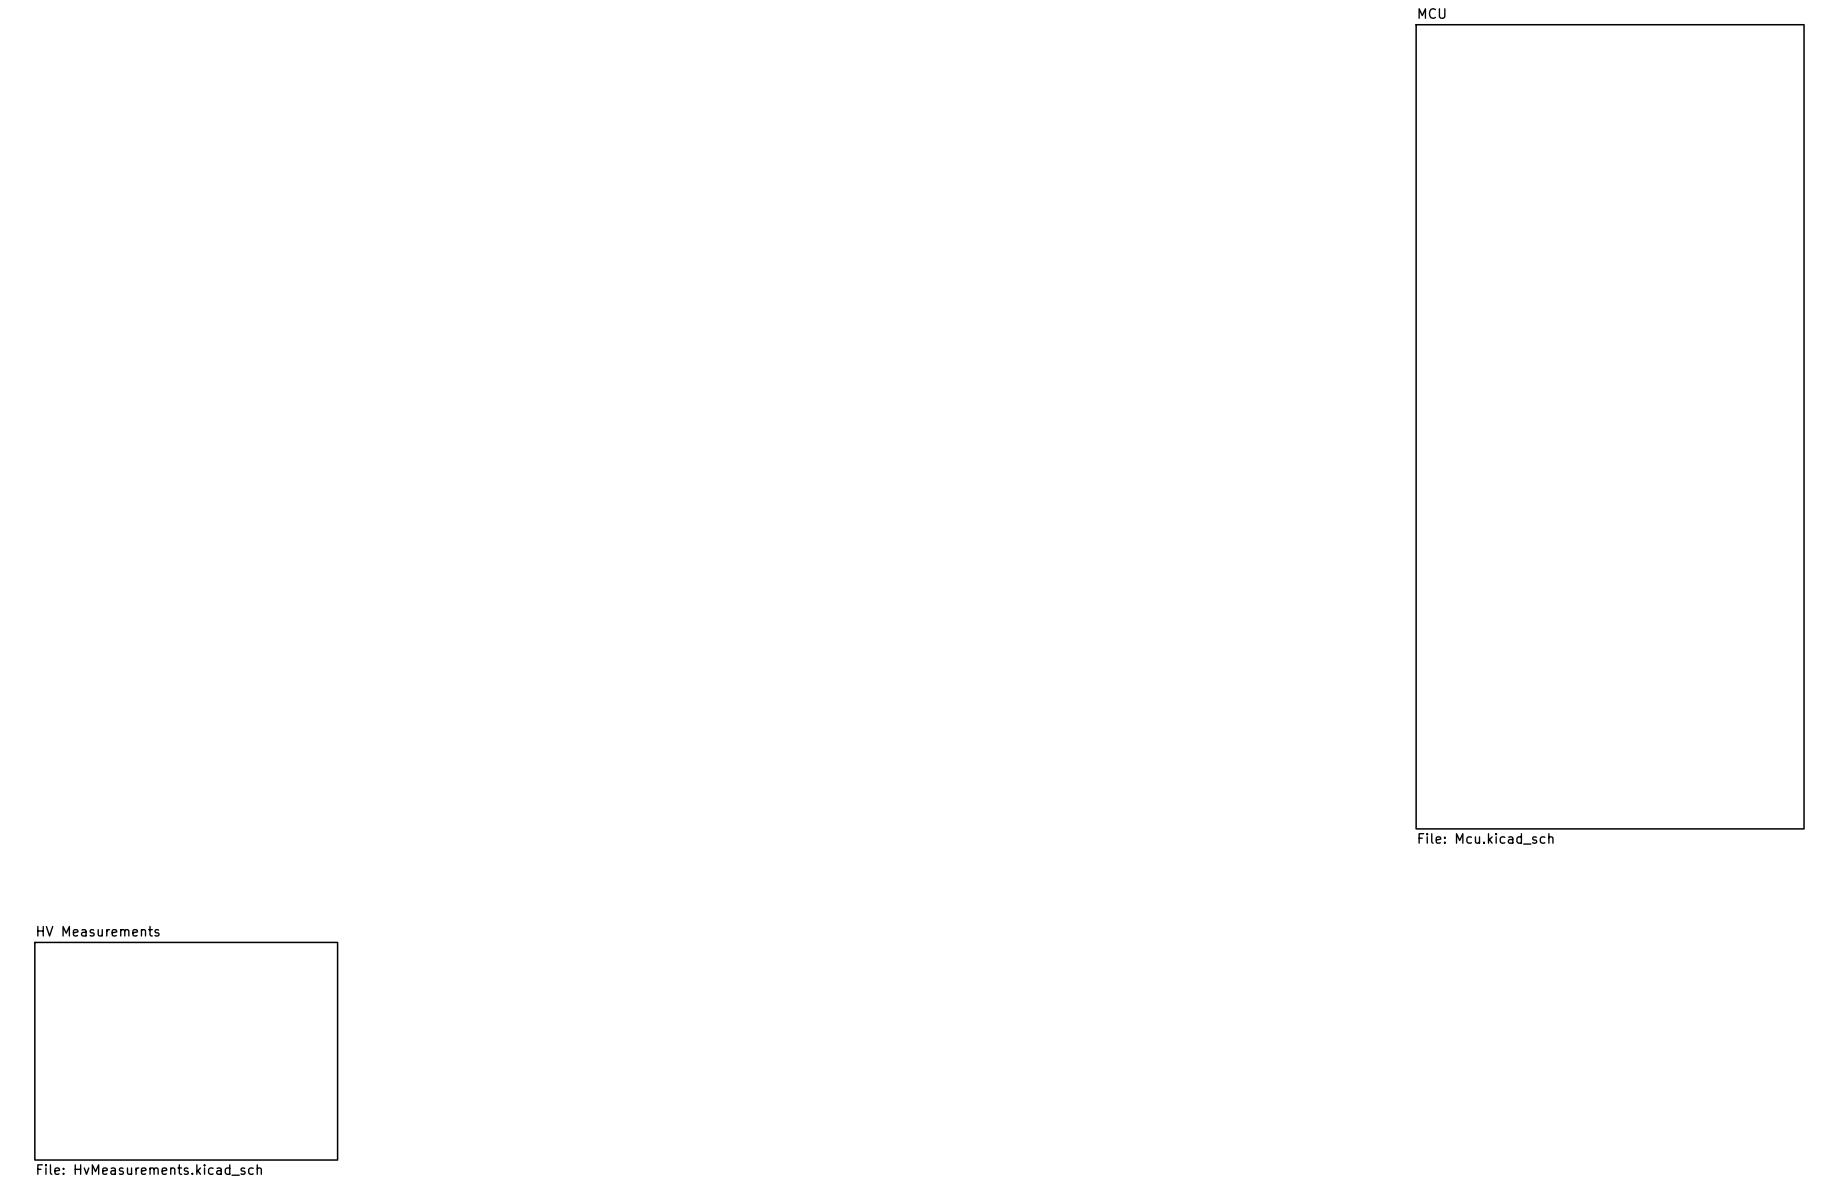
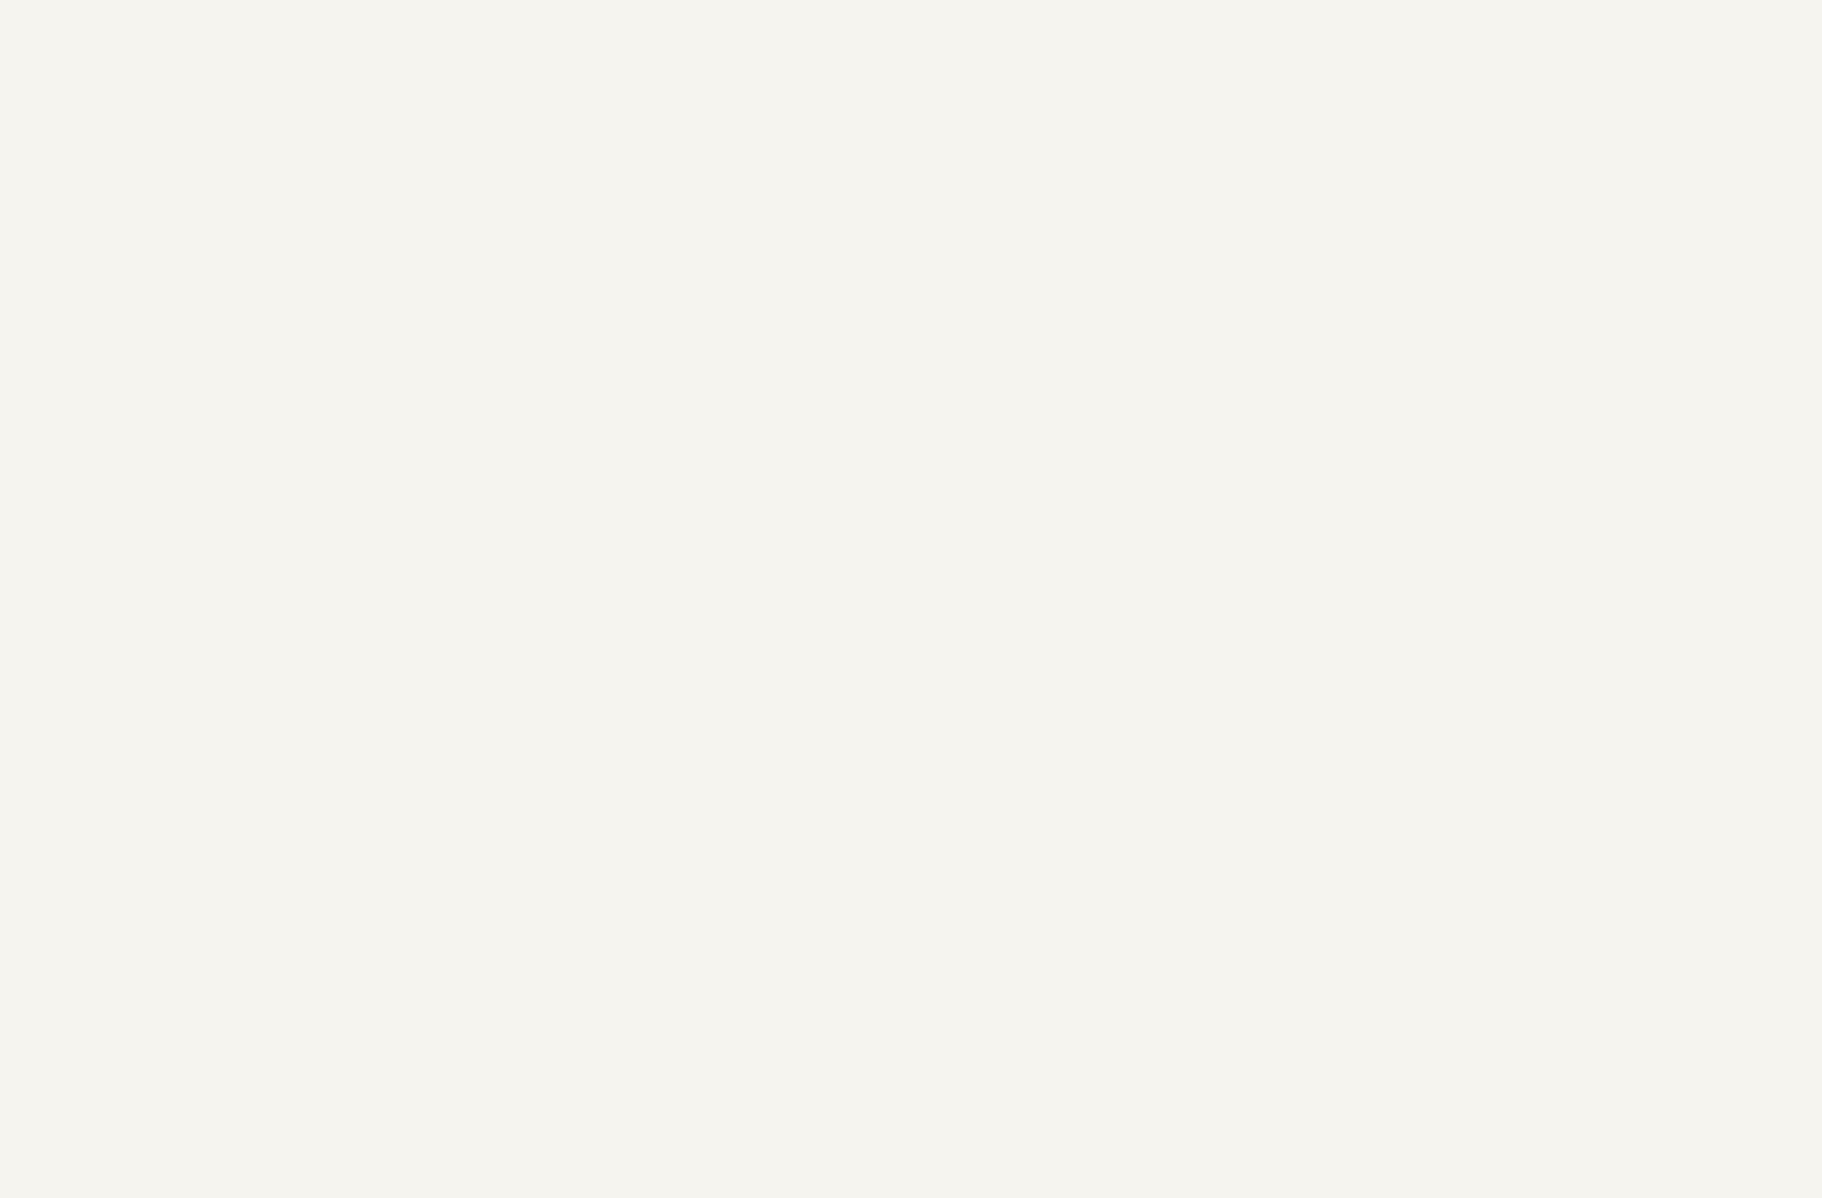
sheet MCU: File: Mcu.kicad_sch (1610, 426) -> none
sheet HV Measurements: File: HvMeasurements.kicad_sch (186, 1051) -> none

